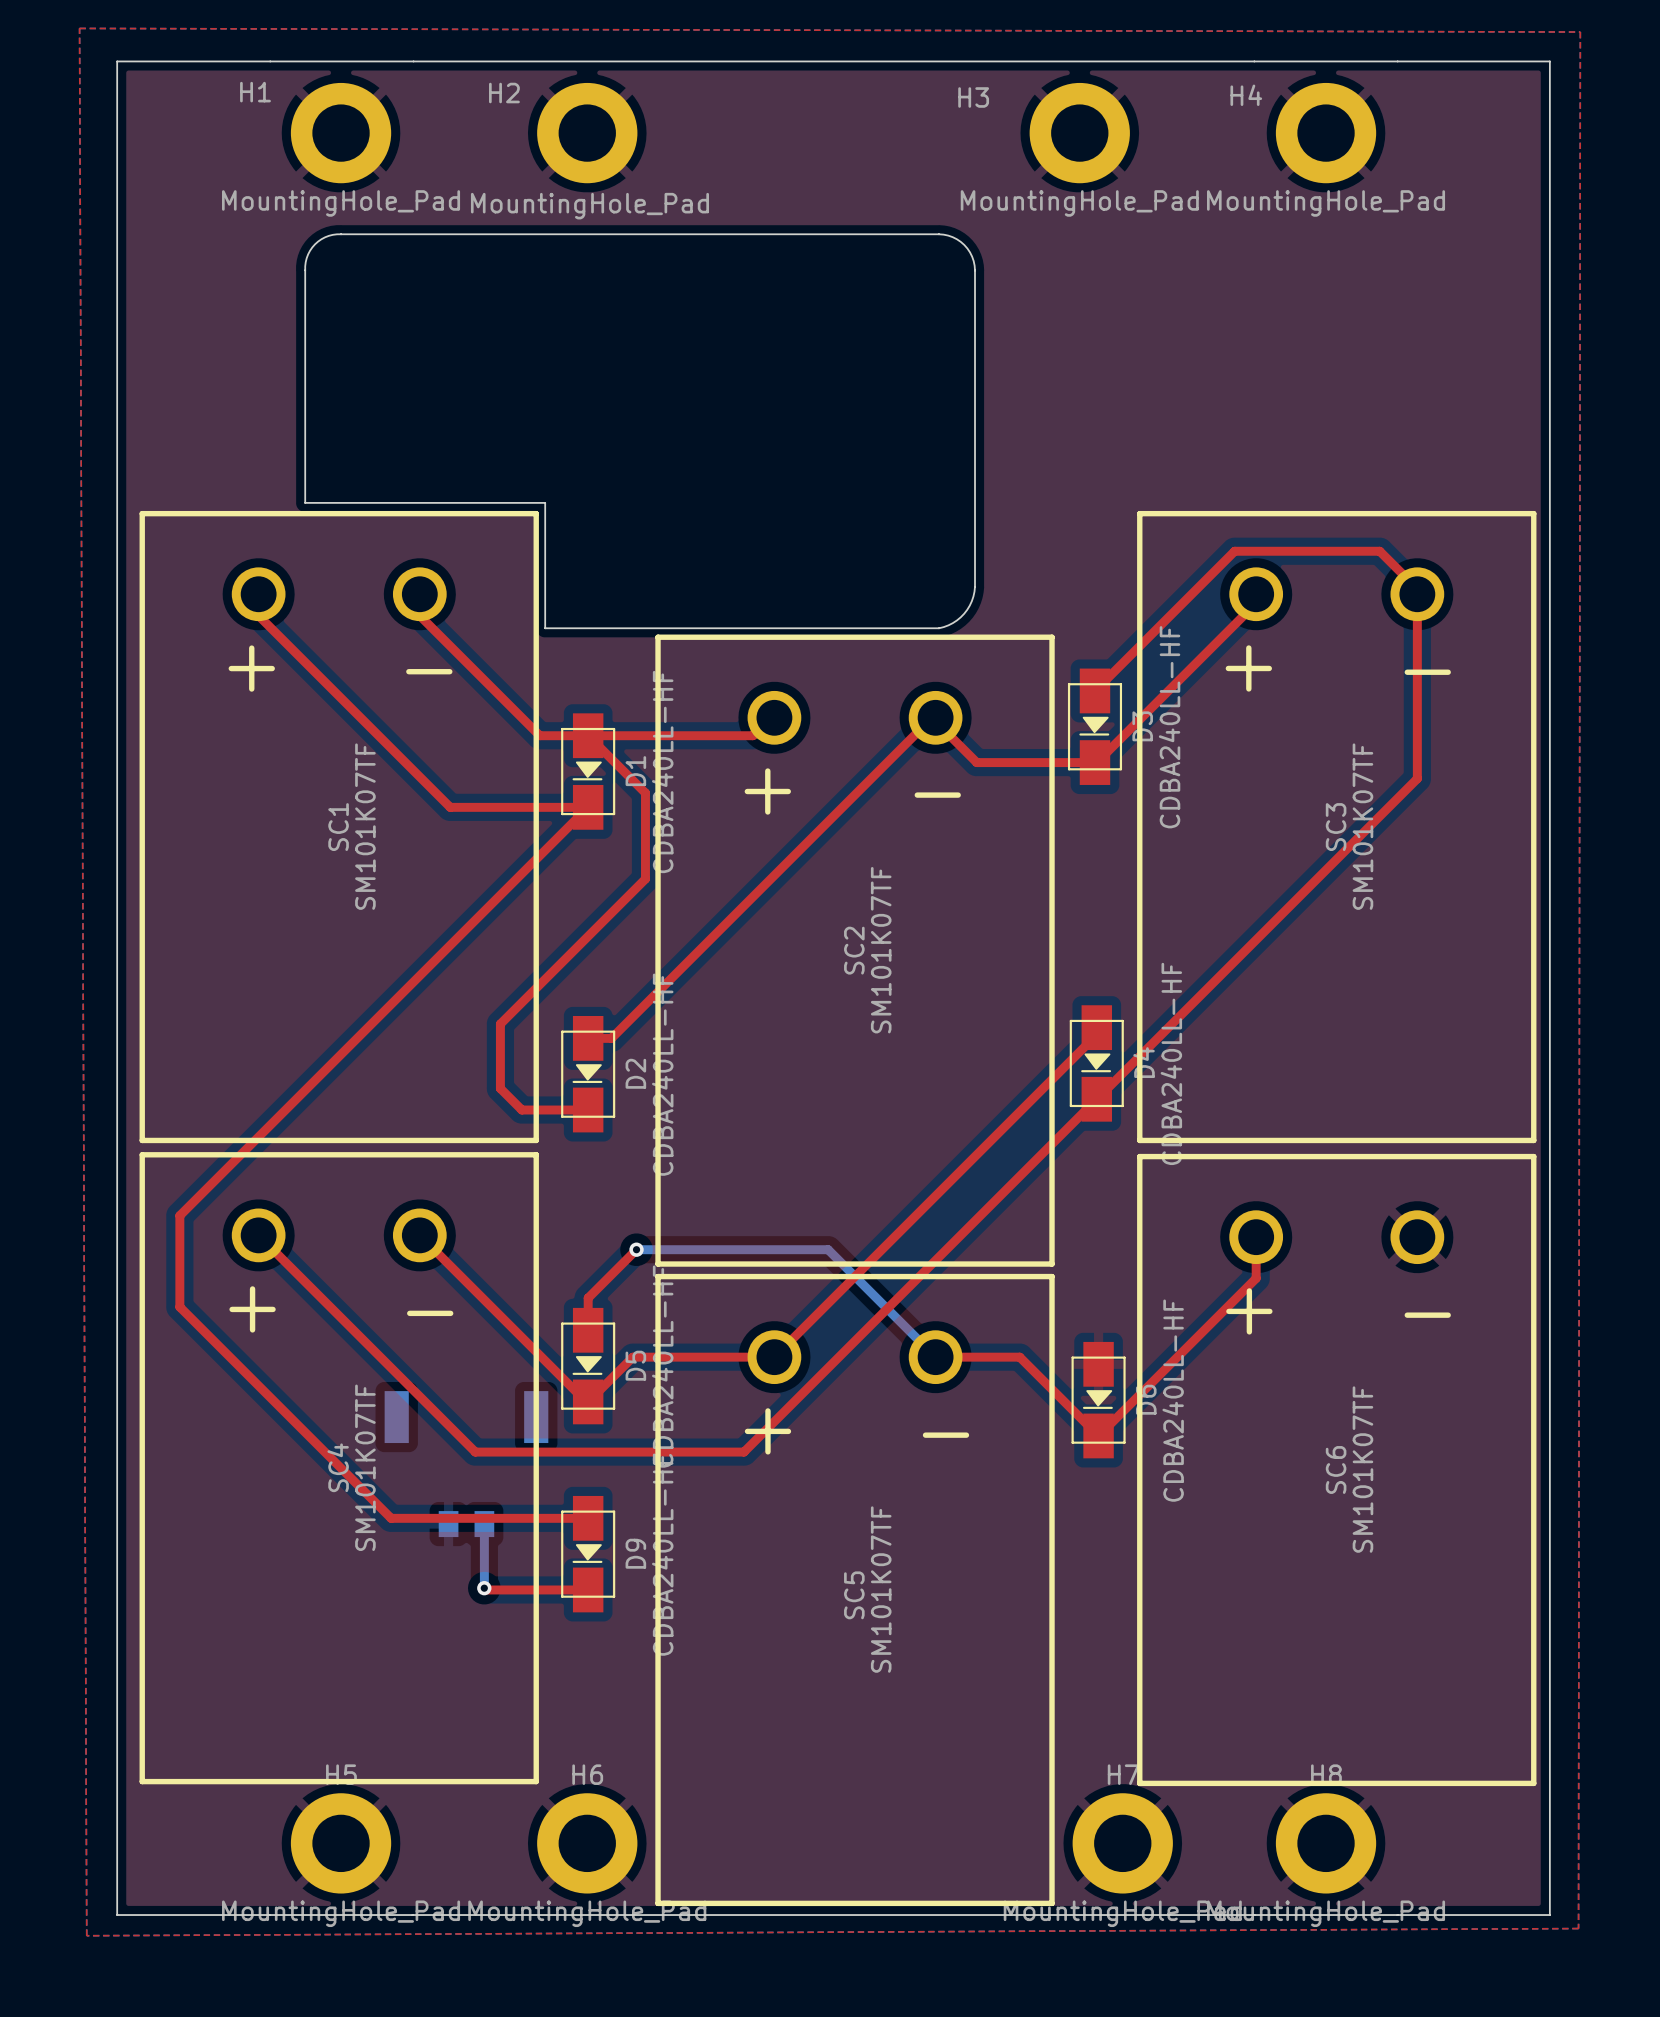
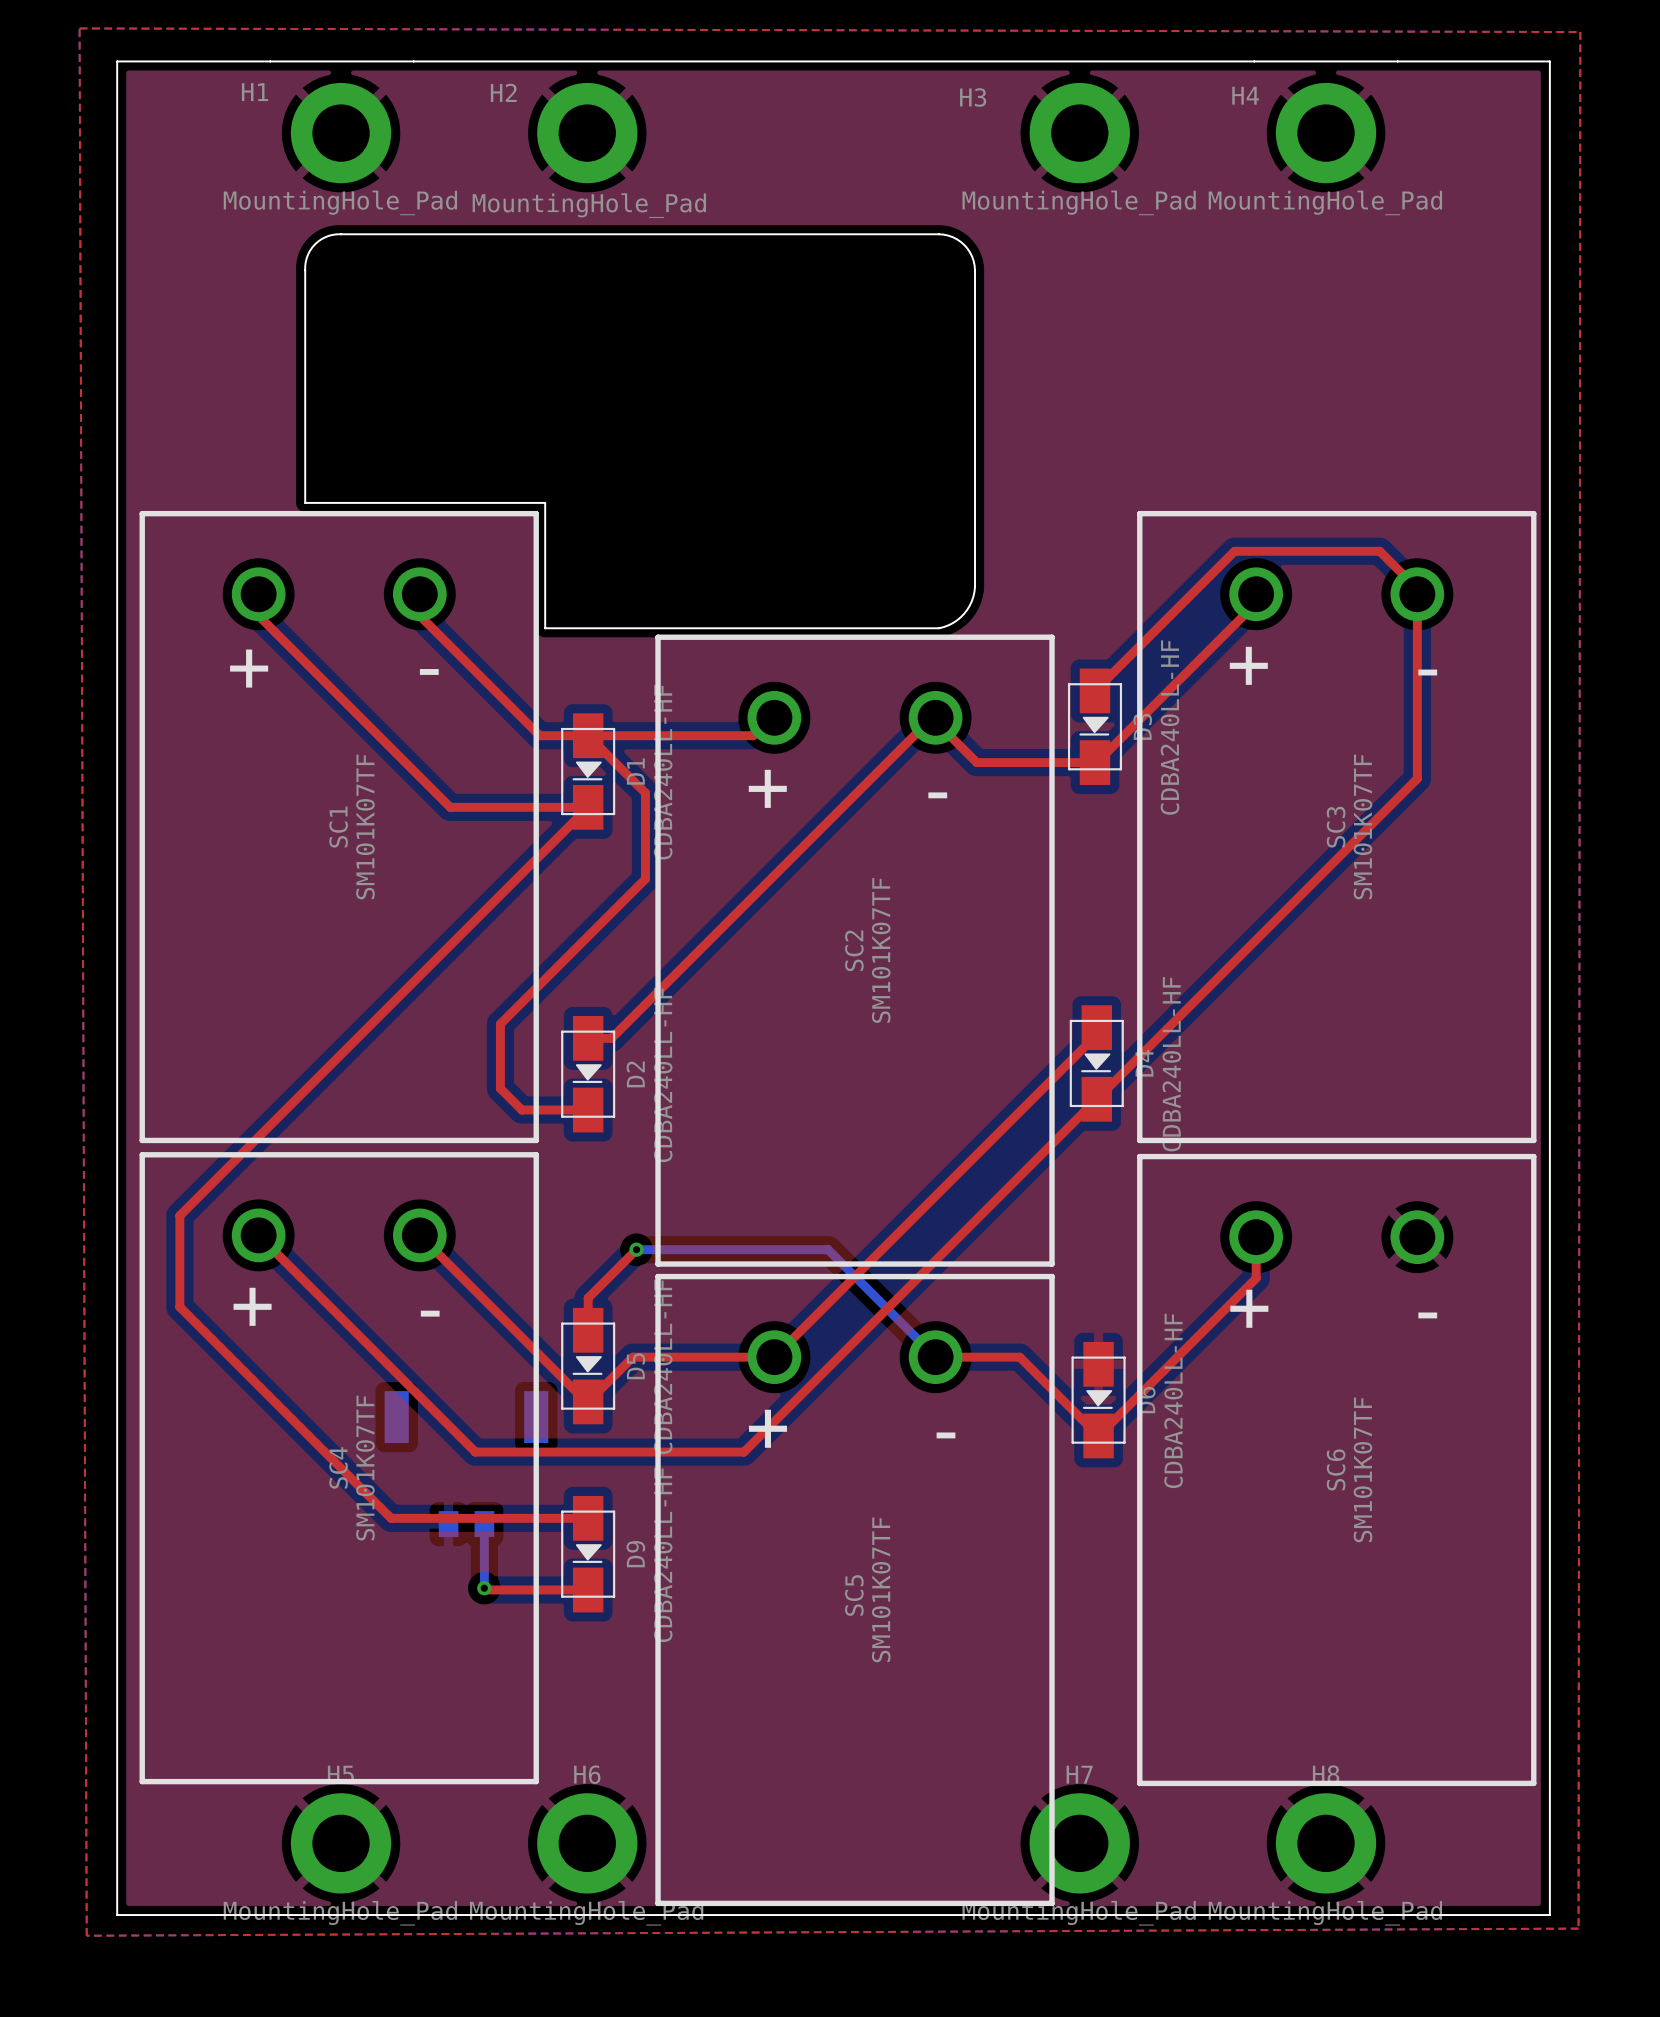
H7 position: (1122, 1843) -> (1079, 1843)

